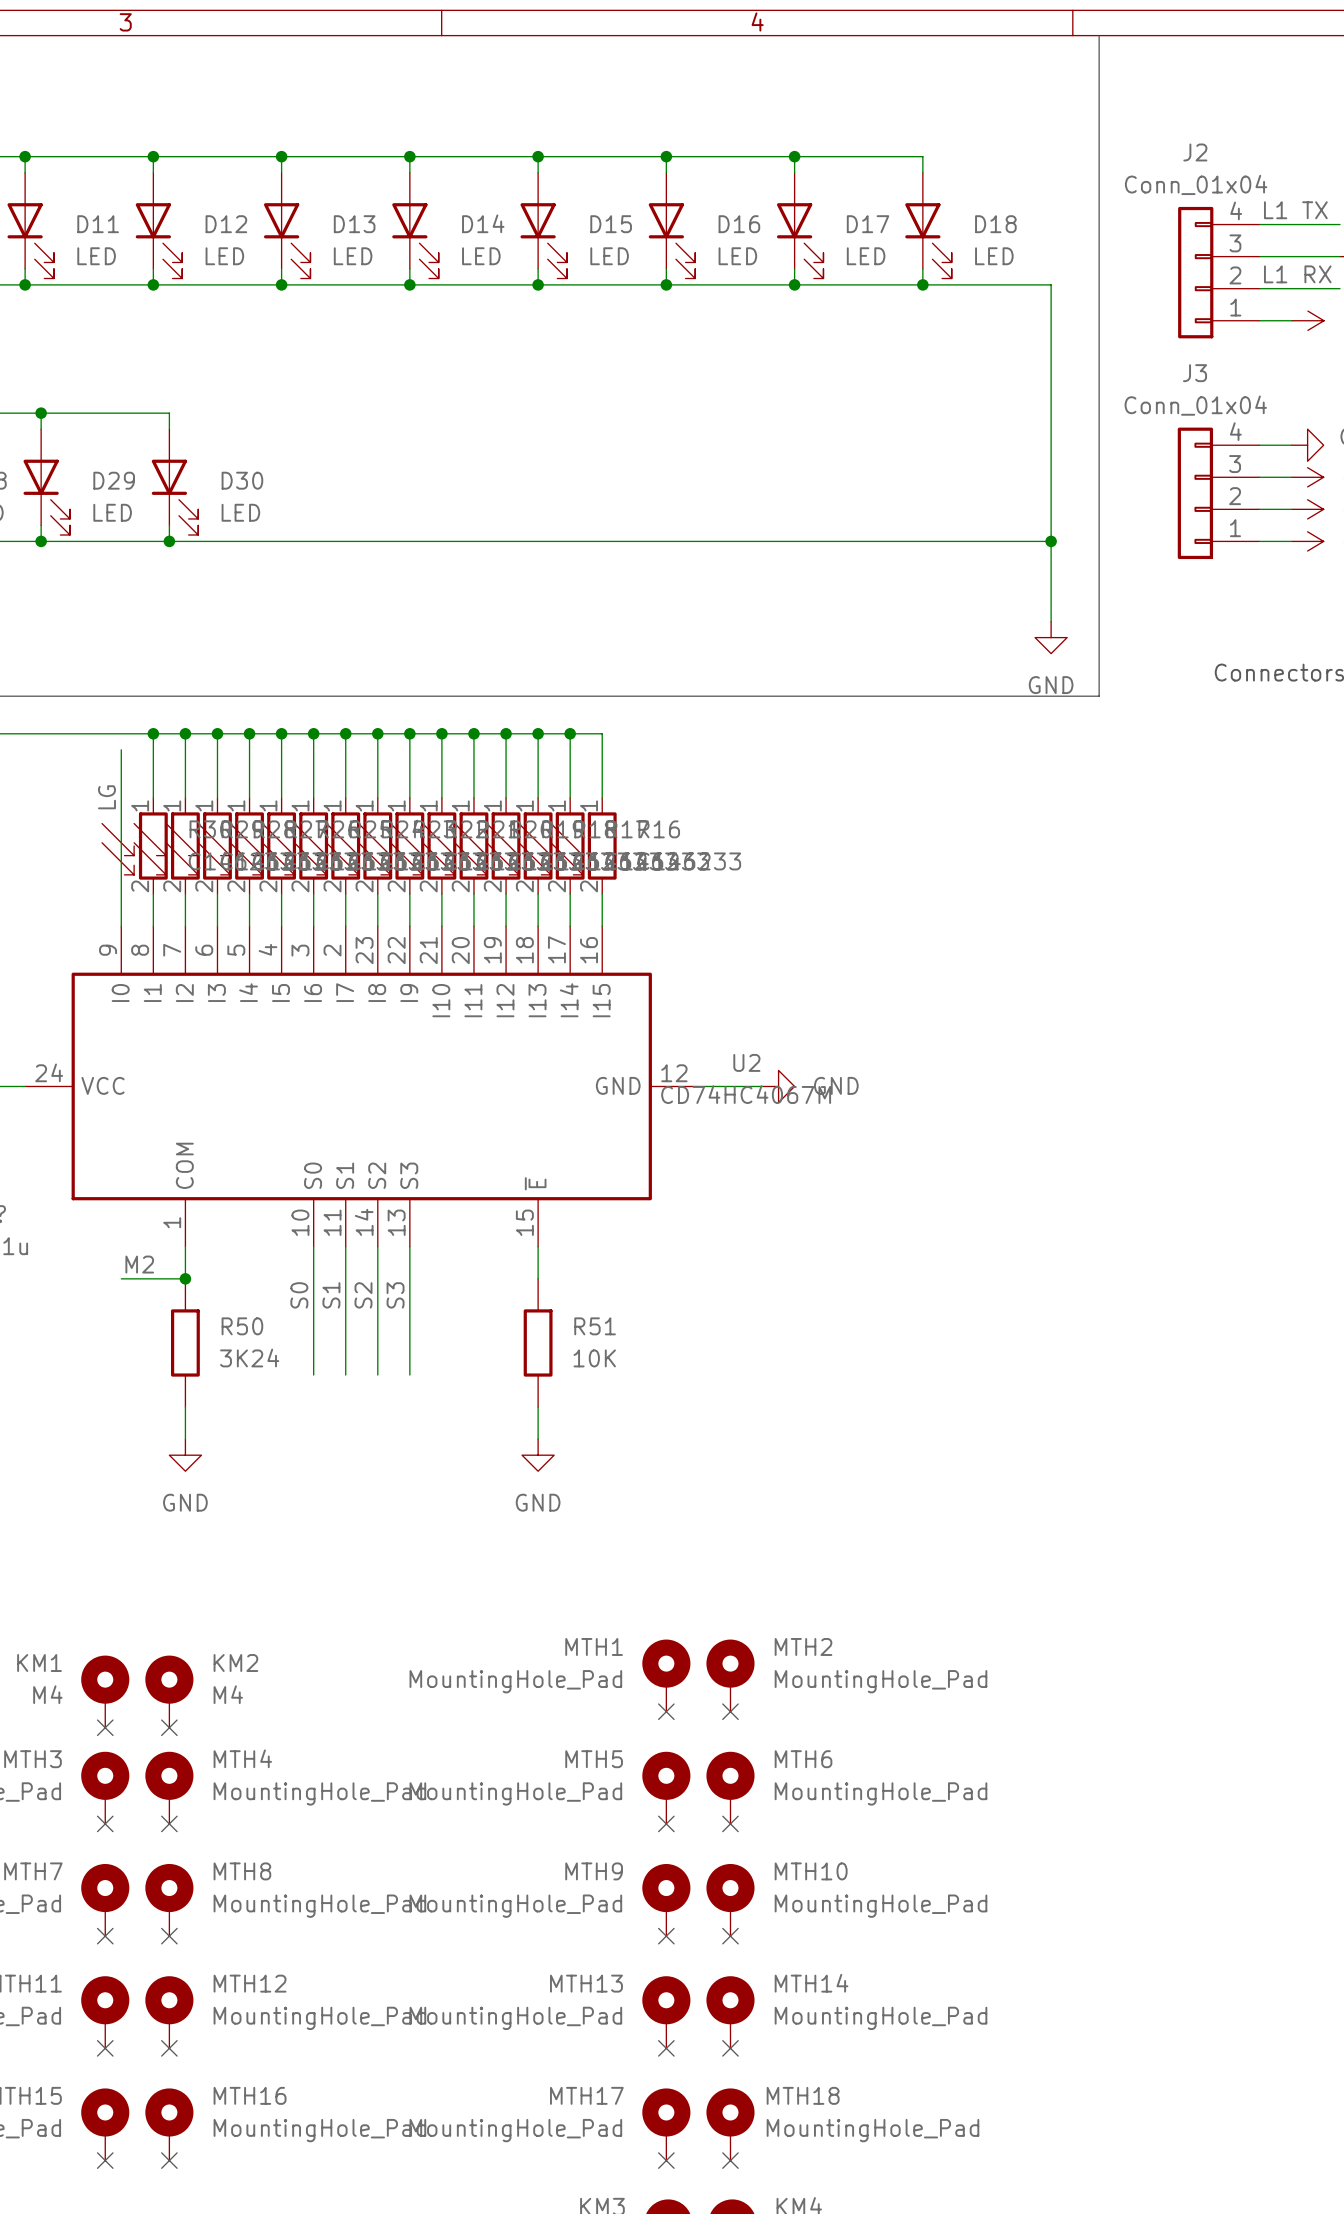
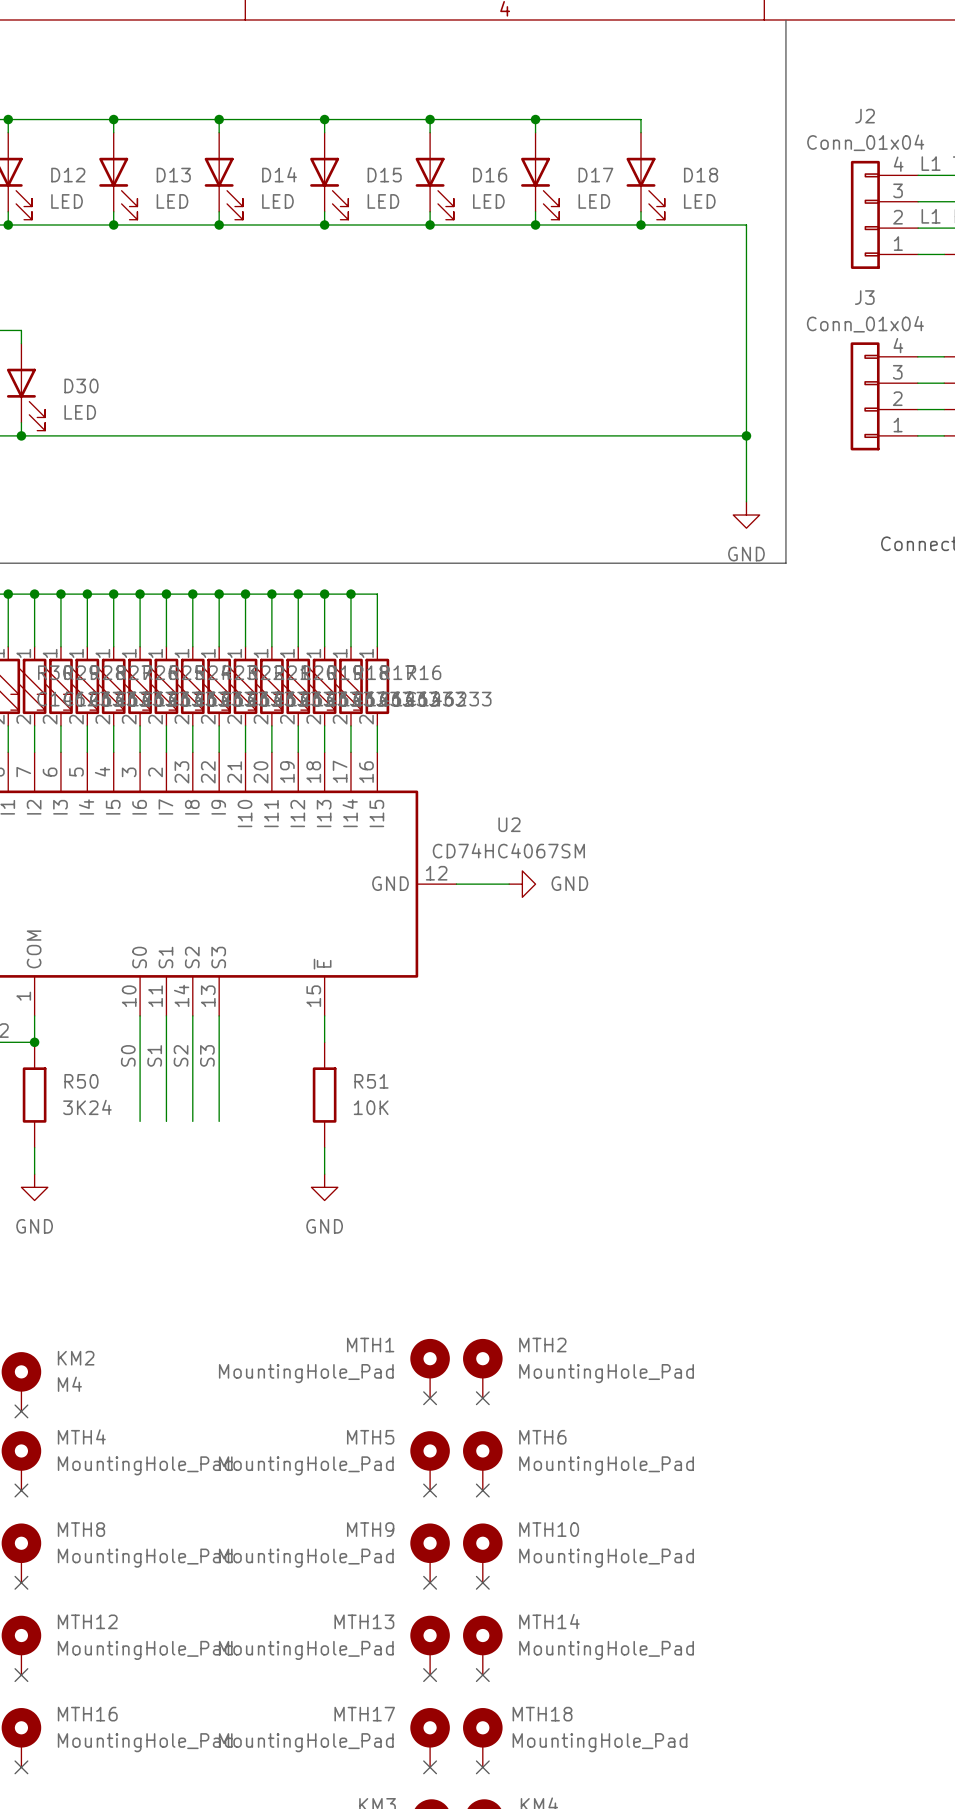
U2 name position: U2 (746, 1062) -> U2 (509, 824)
U2 value: CD74HC4067M (746, 1094) -> CD74HC4067SM (508, 850)

